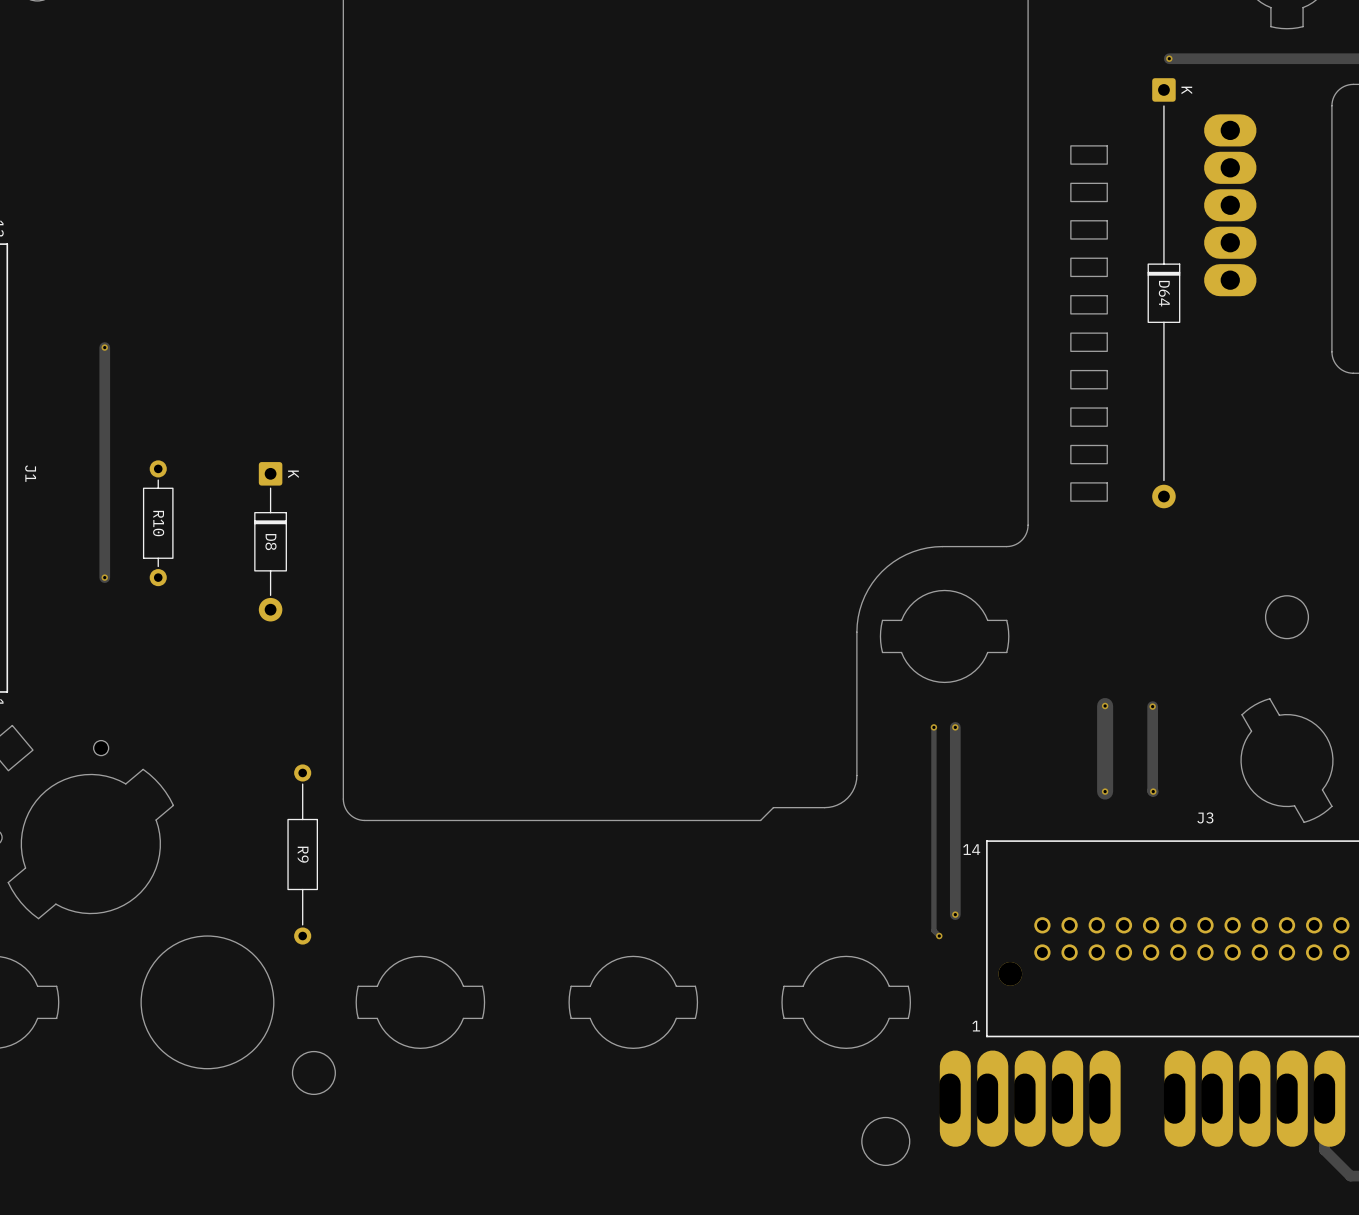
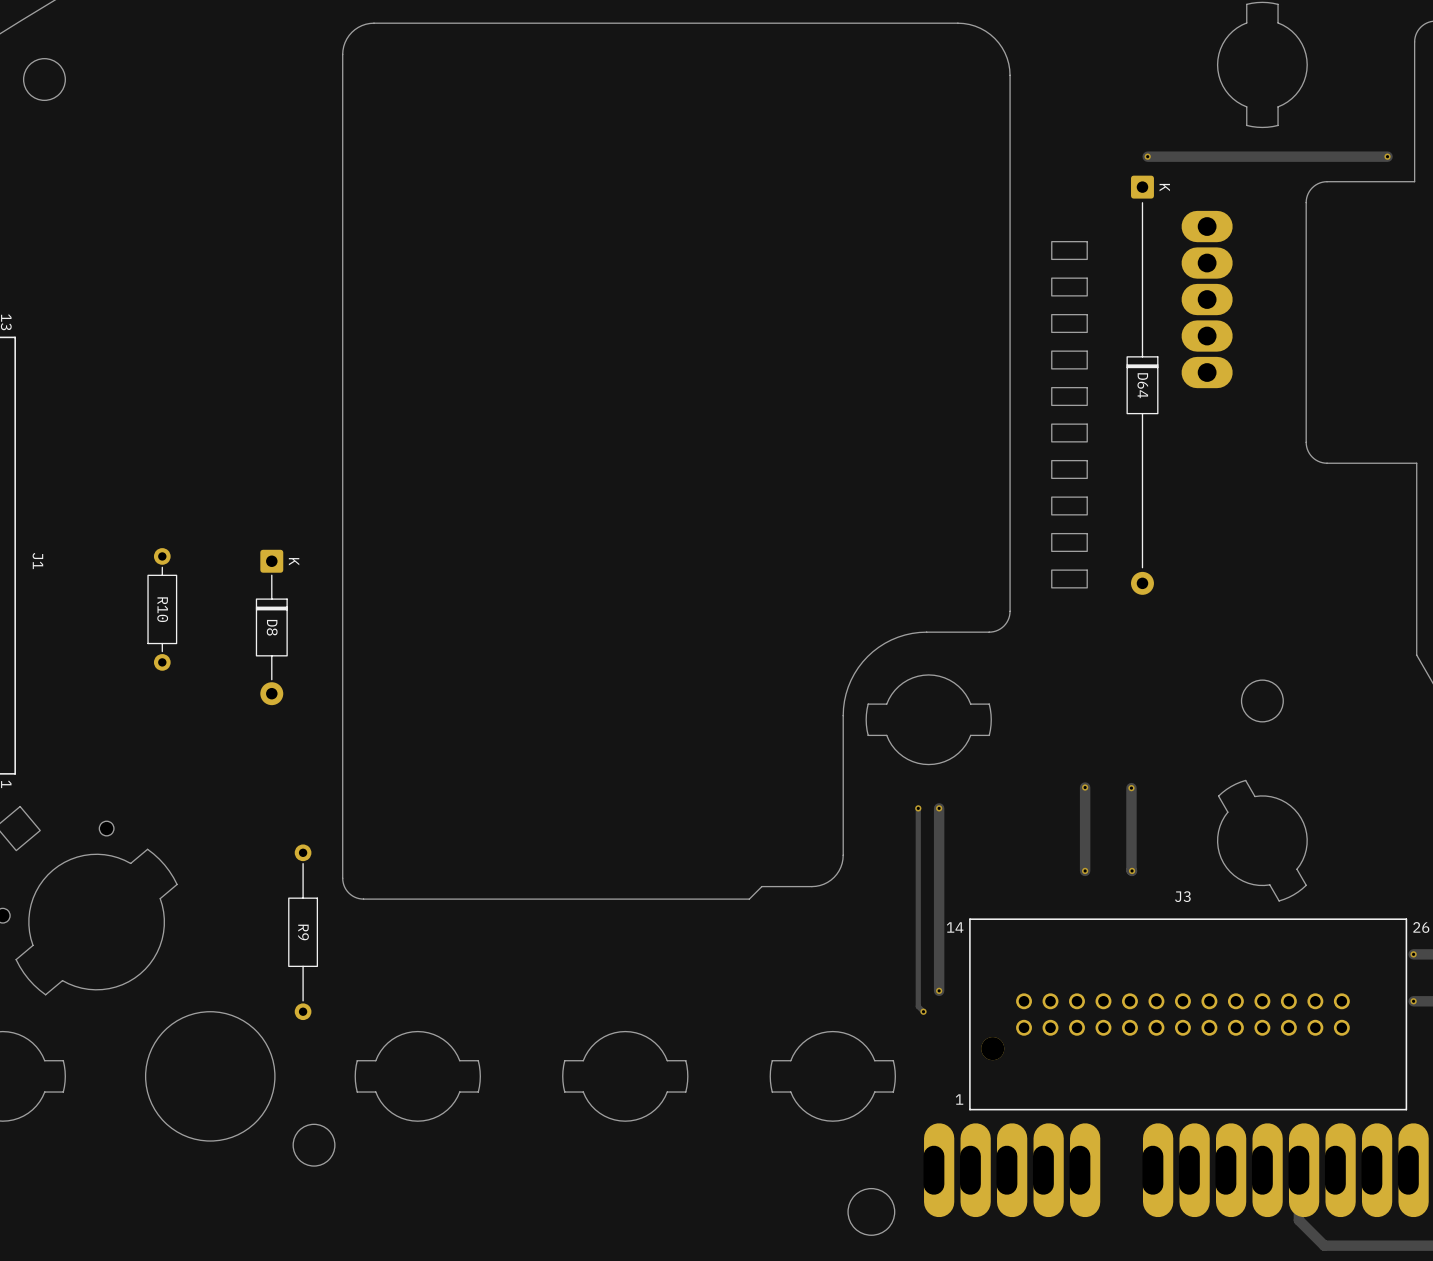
track: (104, 347) (104, 577) -> none
via: (104, 347) -> none
via: (104, 577) -> none
track width: thick (1105, 705) (1105, 791) -> thin (1085, 787) (1085, 870)

